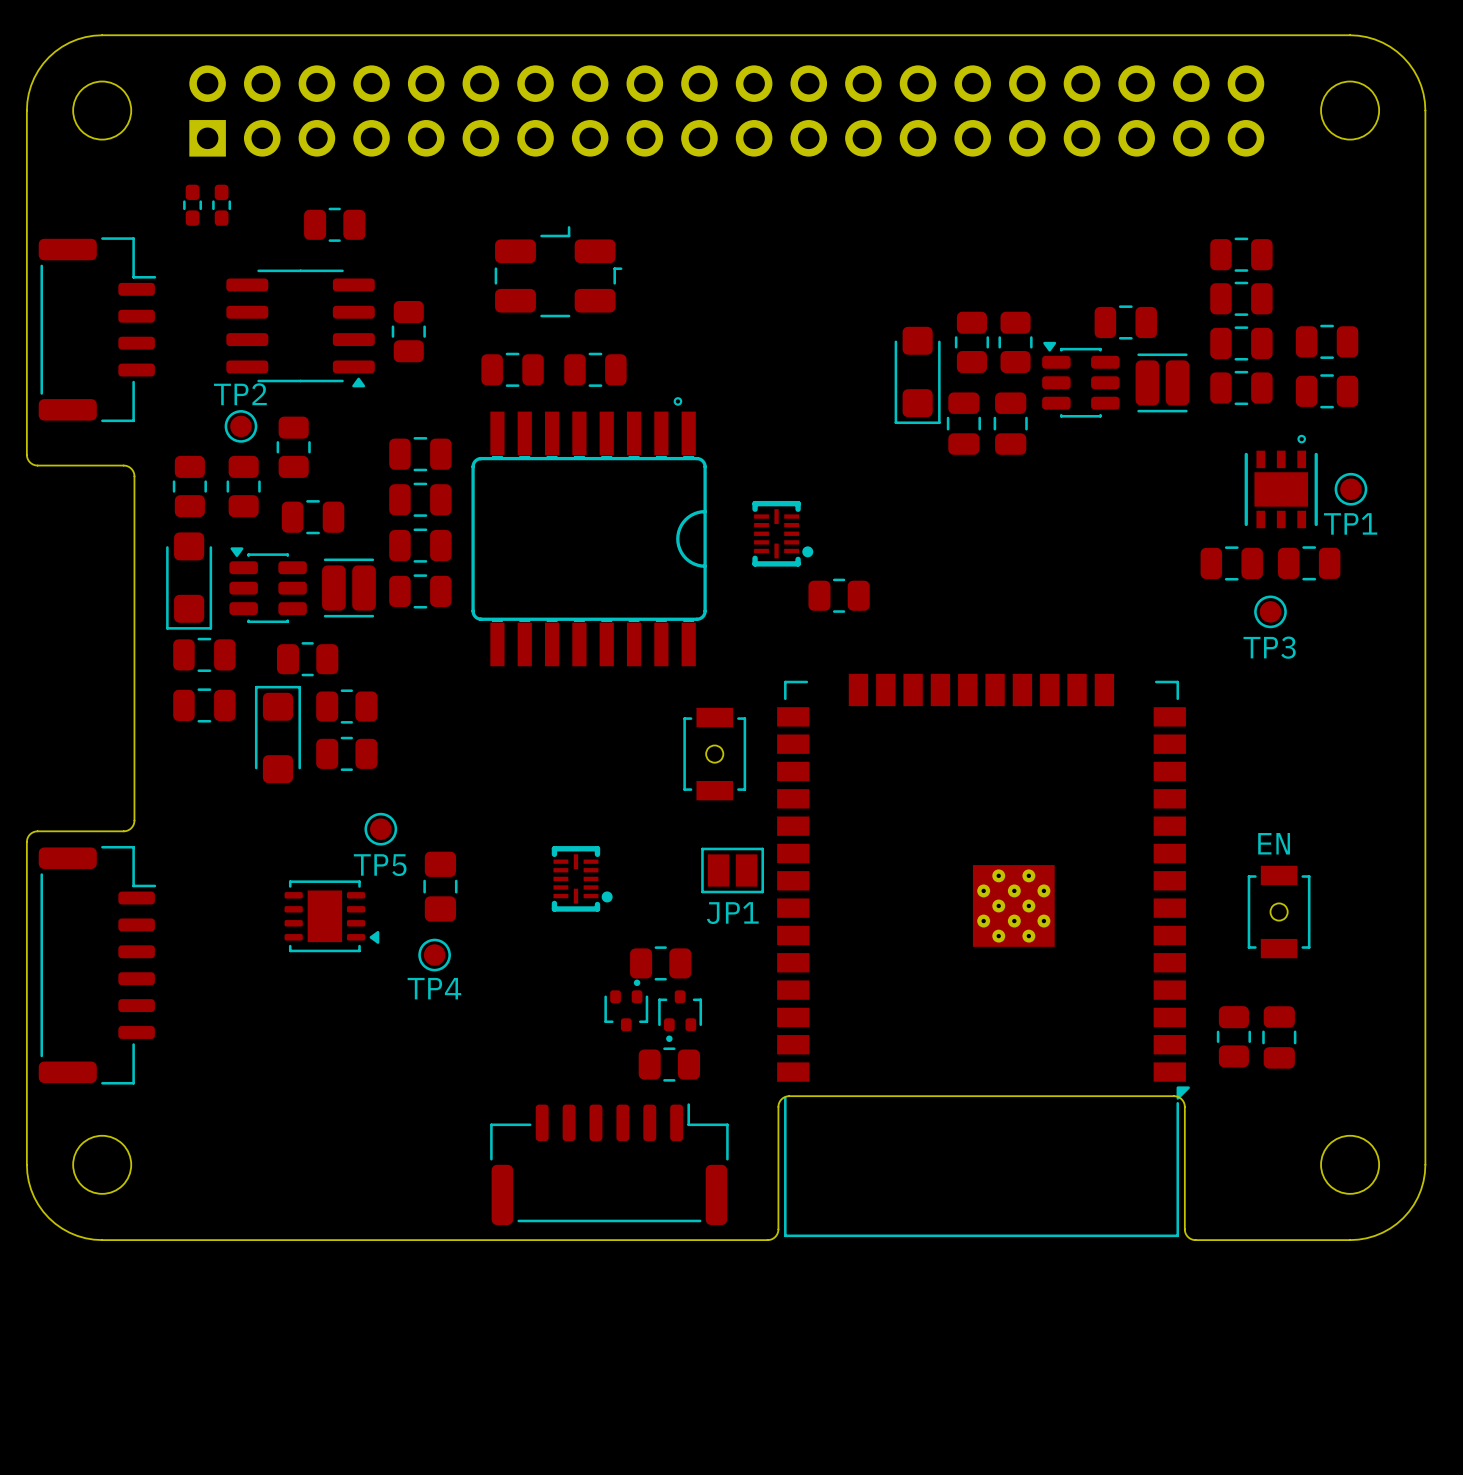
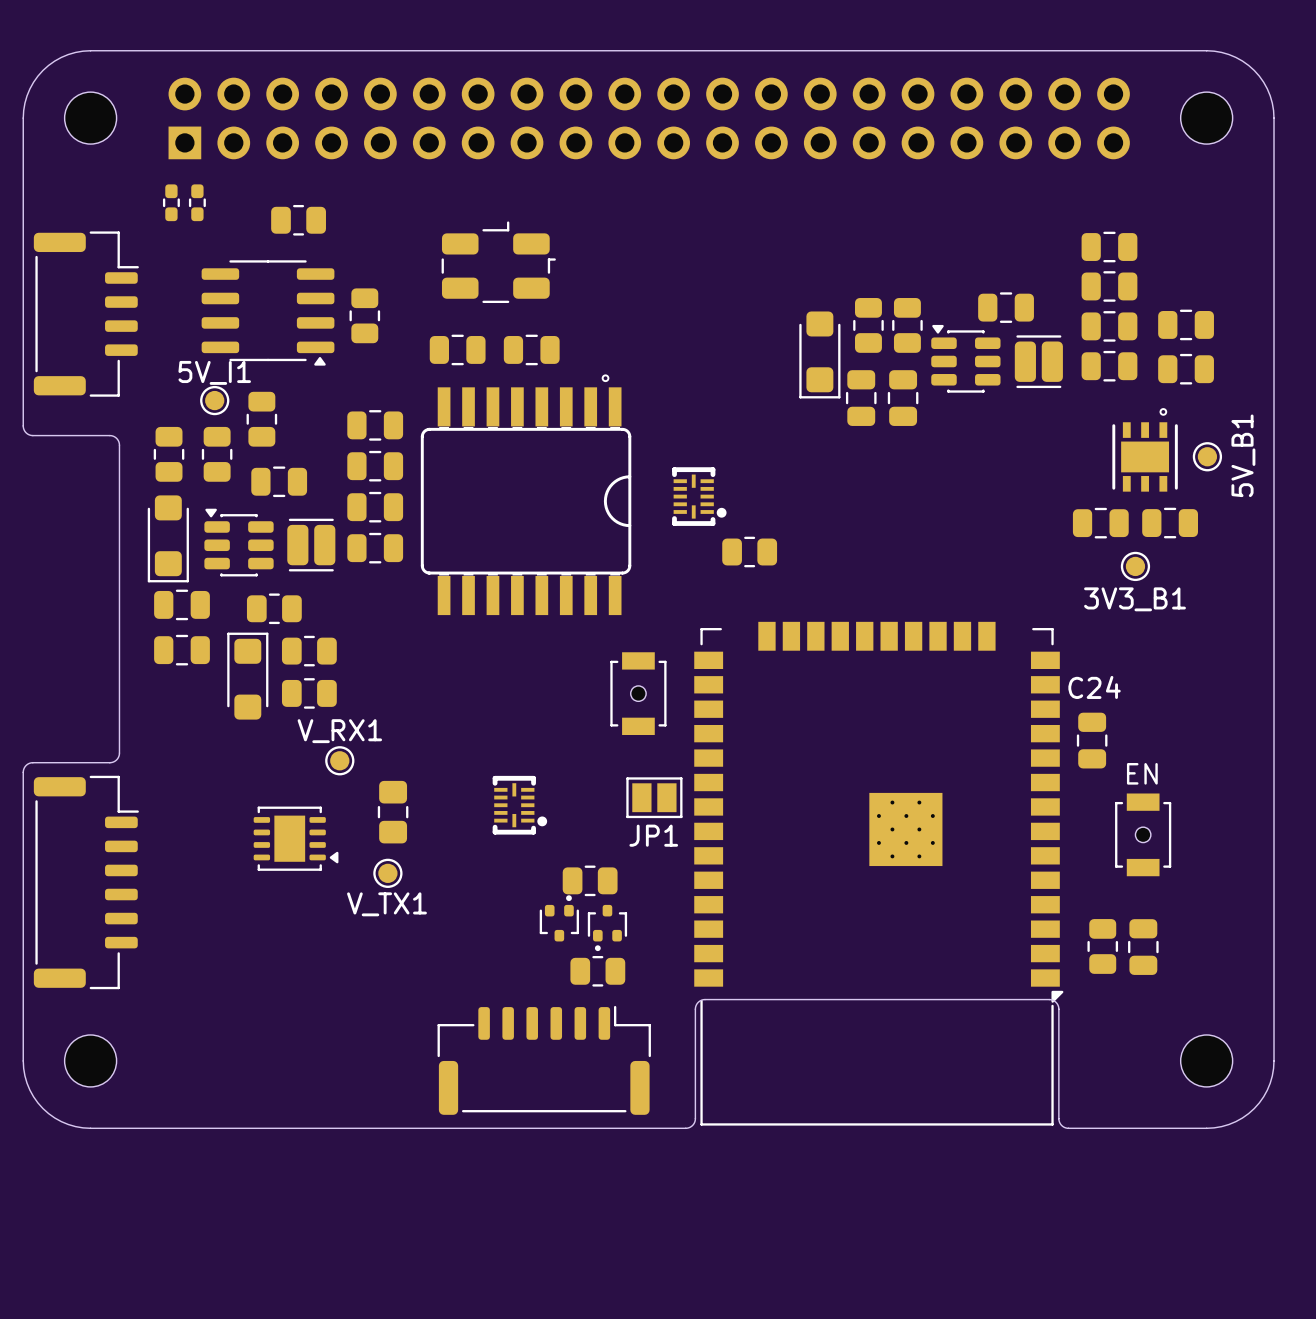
TP2 name: TP2 (240, 394) -> 5V_I1 (214, 372)
TP1 name: TP1 (1350, 523) -> 5V_B1 (1243, 455)
TP3 name: TP3 (1269, 647) -> 3V3_B1 (1135, 599)
C24: none -> (1092, 740)
TP5 name: TP5 (380, 865) -> V_RX1 (339, 731)
TP4 name: TP4 (434, 988) -> V_TX1 (386, 904)

